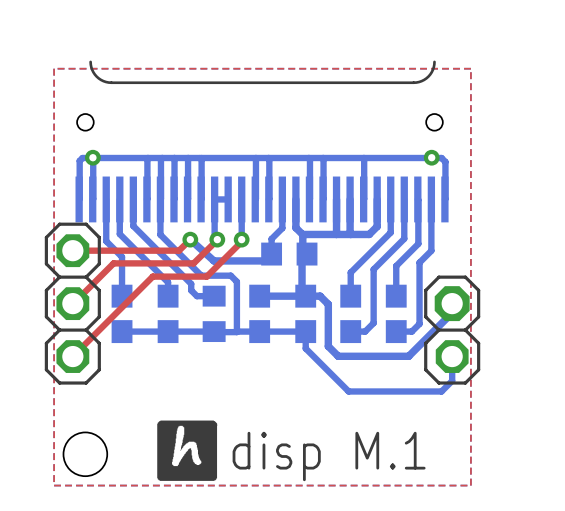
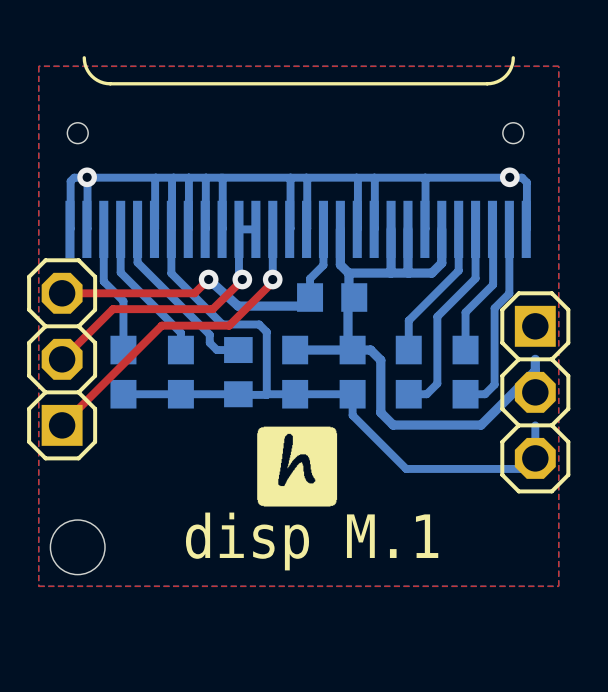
part footprint: [44, 222, 101, 385] -> [27, 258, 98, 461]
part footprint: [424, 275, 481, 385] -> [500, 291, 571, 494]
drawing: none -> [257, 426, 338, 507]
drawing: [157, 420, 218, 481] -> none
text position: disp M.1 (329, 456) -> disp M.1 (312, 541)

